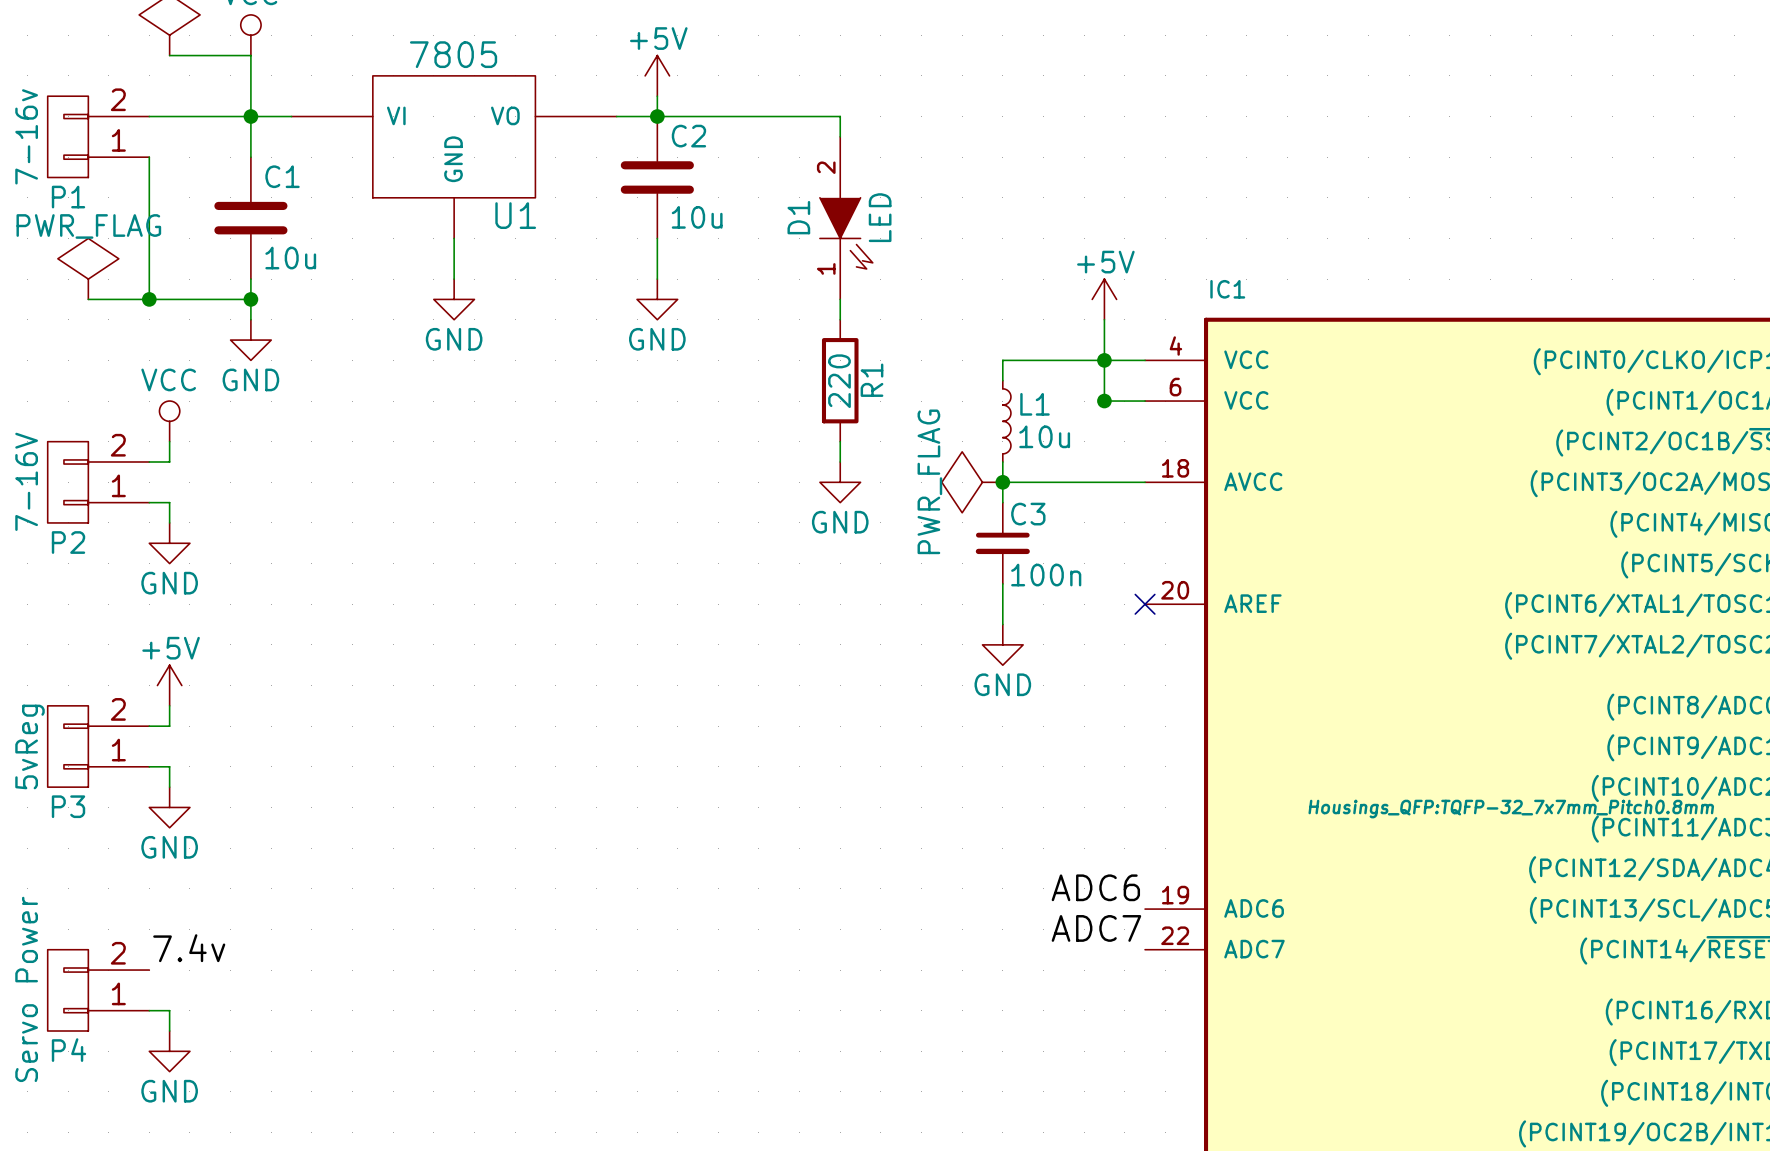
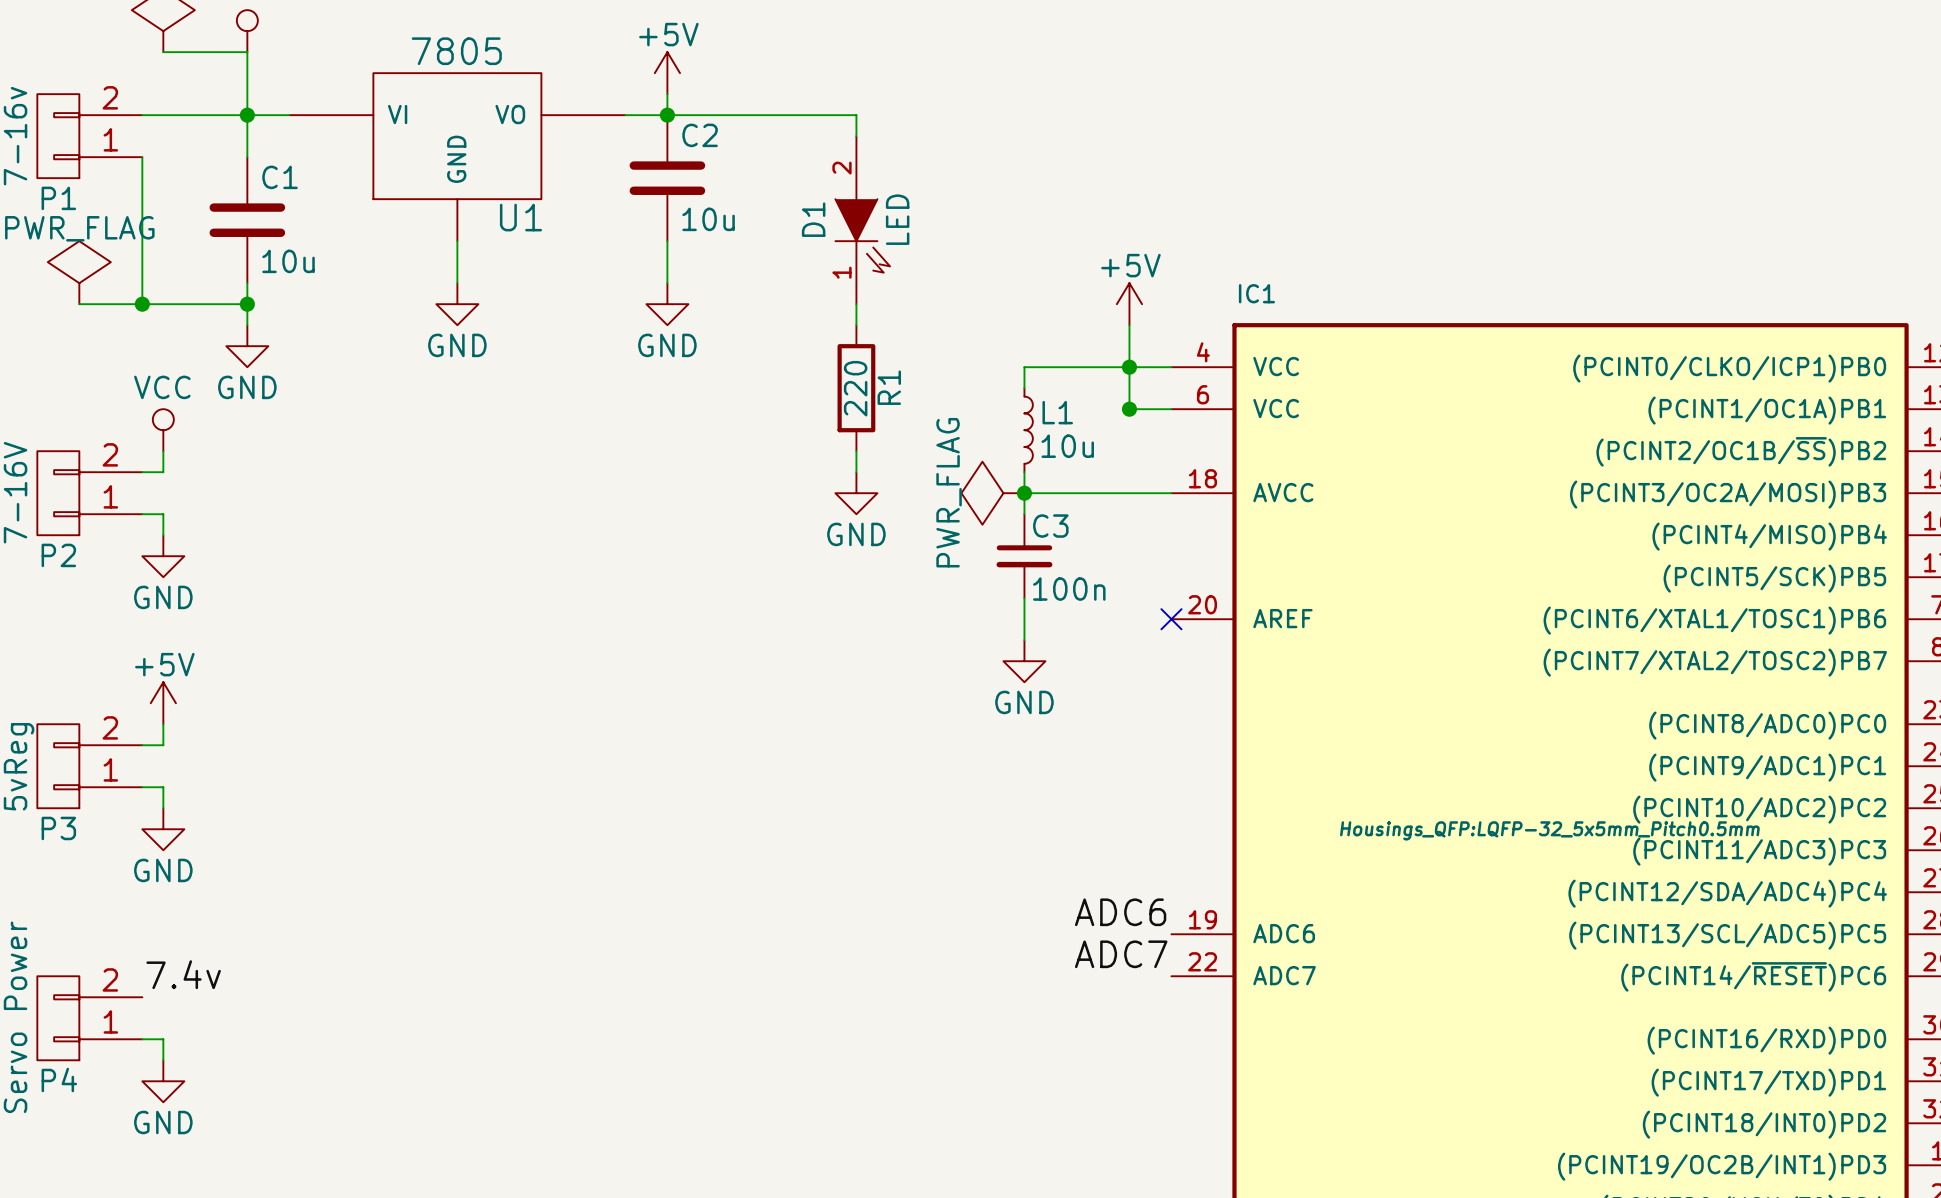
IC1 text: Housings_QFP:TQFP-32_7x7mm_Pitch0.8mm (1511, 809) -> Housings_QFP:LQFP-32_5x5mm_Pitch0.5mm (1549, 830)

